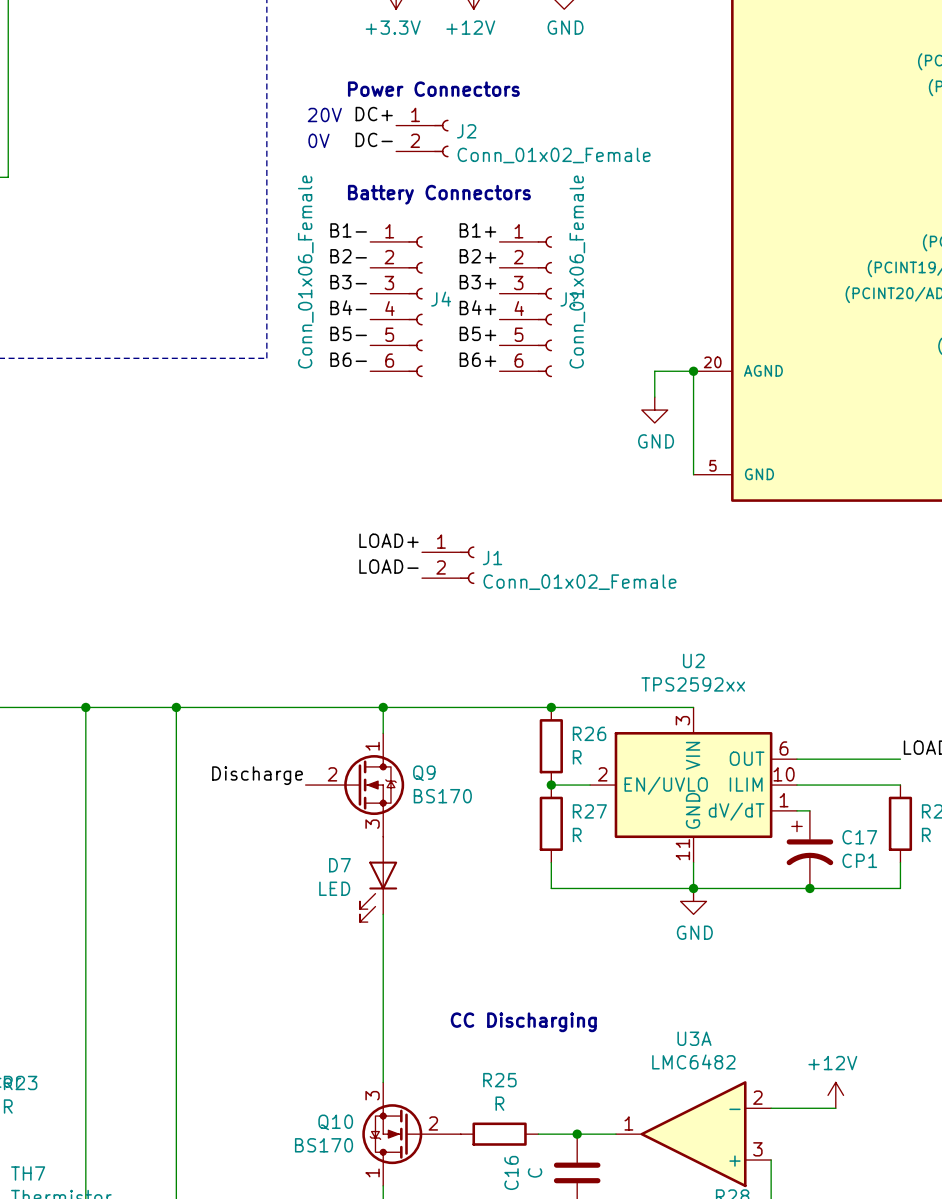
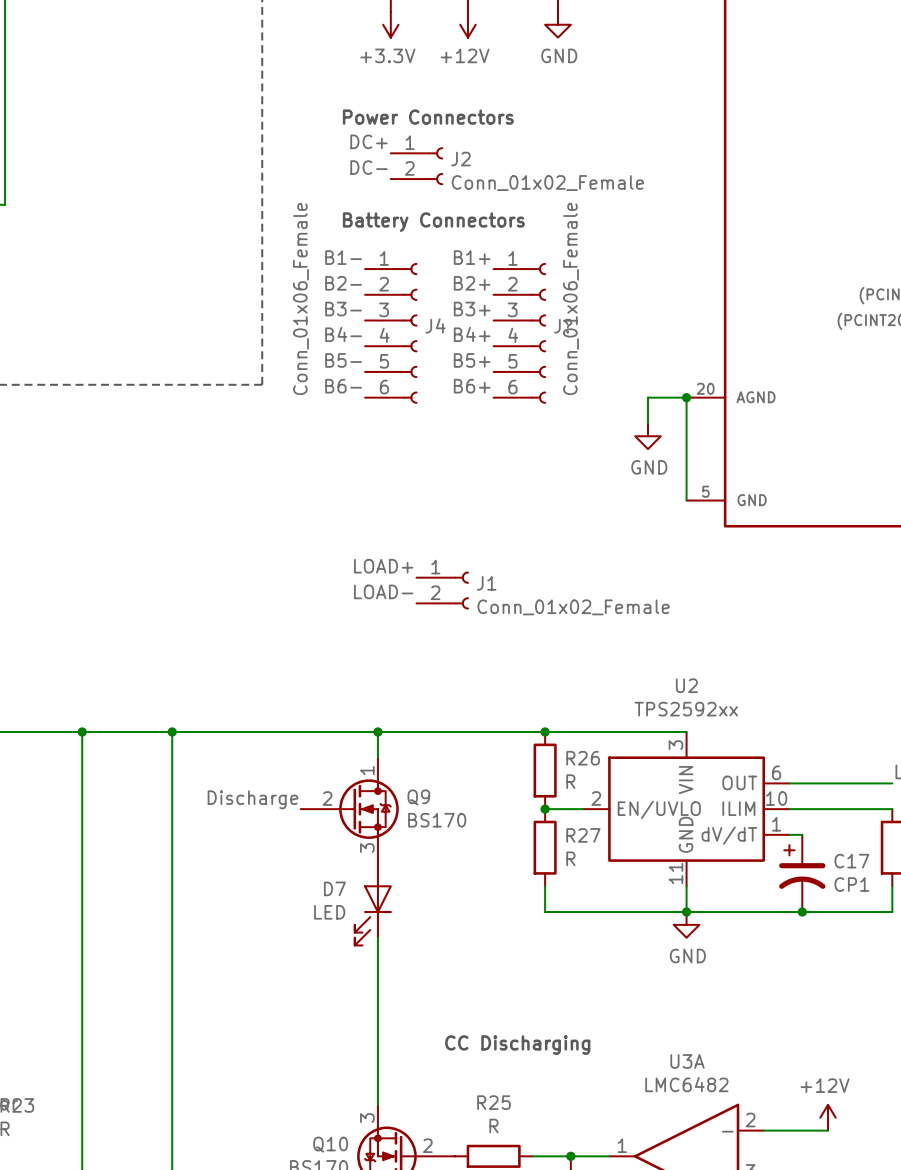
text: 20V (324, 114) -> none
text: 0V (318, 140) -> none

